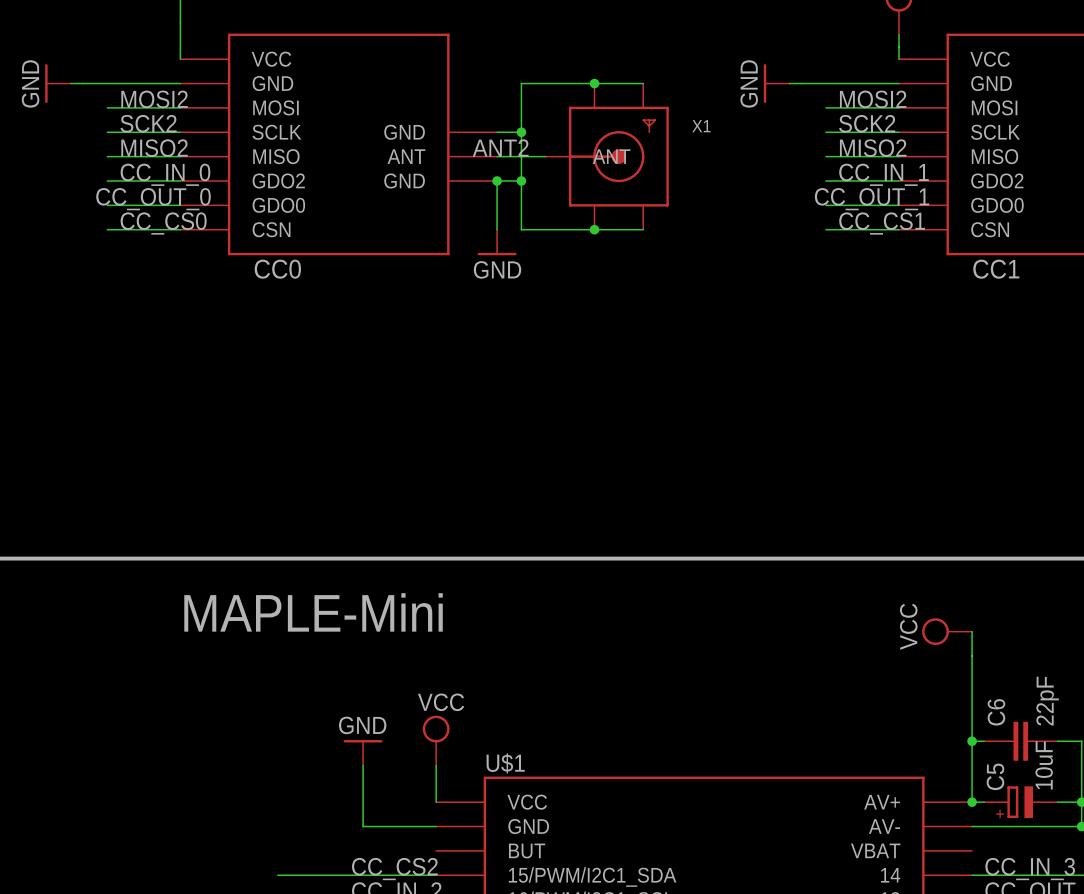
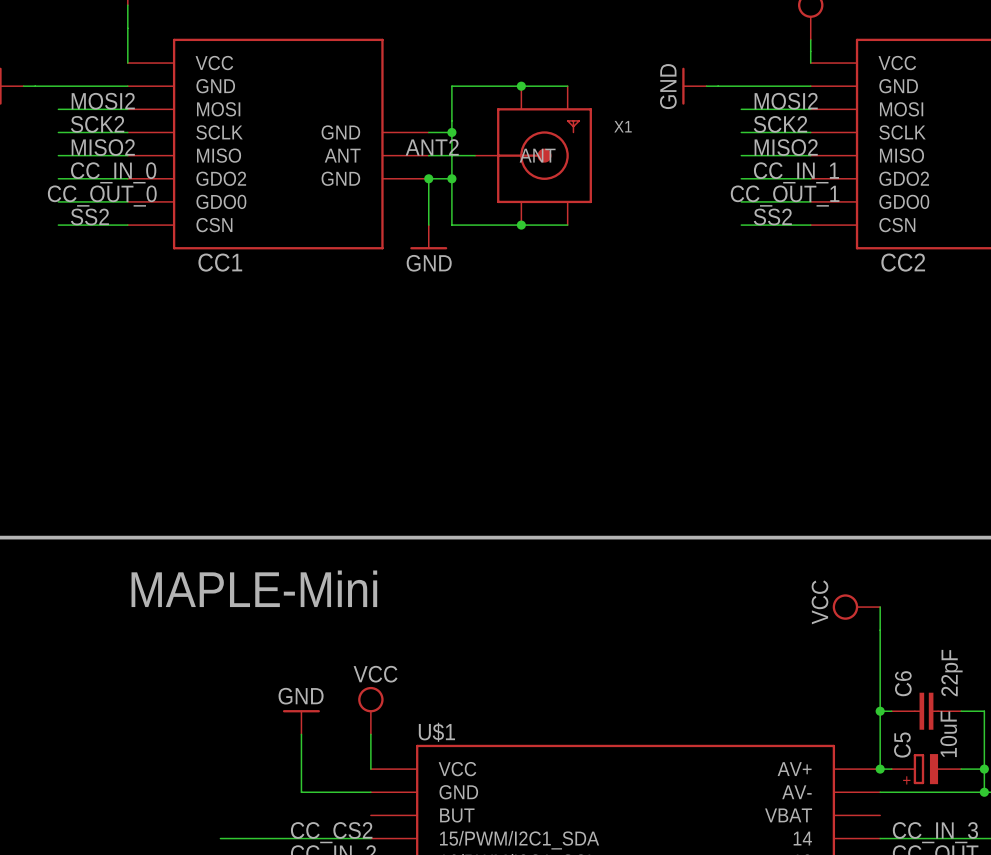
label: CC_CS0 (163, 223) -> SS2 (89, 216)
label: CC_CS1 (882, 223) -> SS2 (772, 216)
CC0 name: CC0 (277, 269) -> CC1 (220, 262)
CC1 name: CC1 (996, 269) -> CC2 (903, 262)

